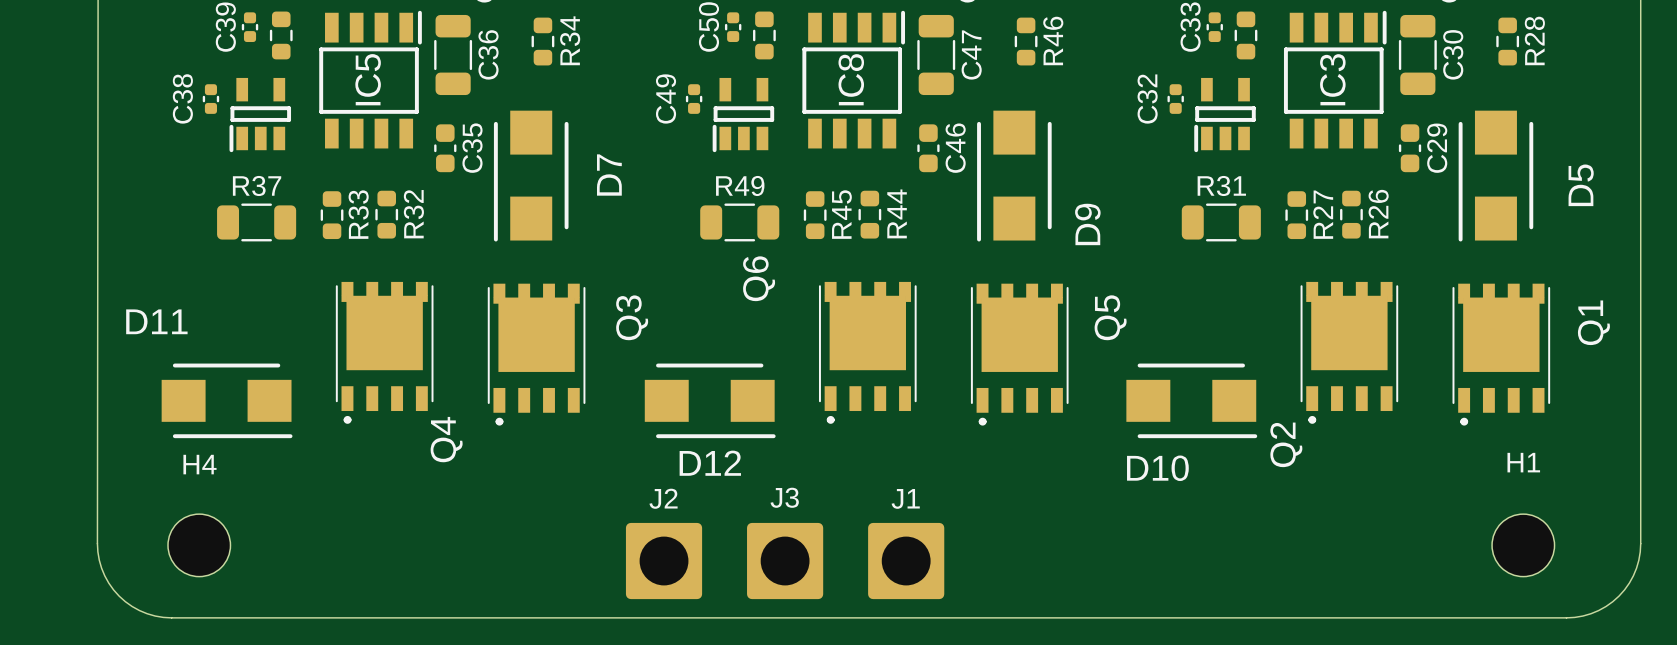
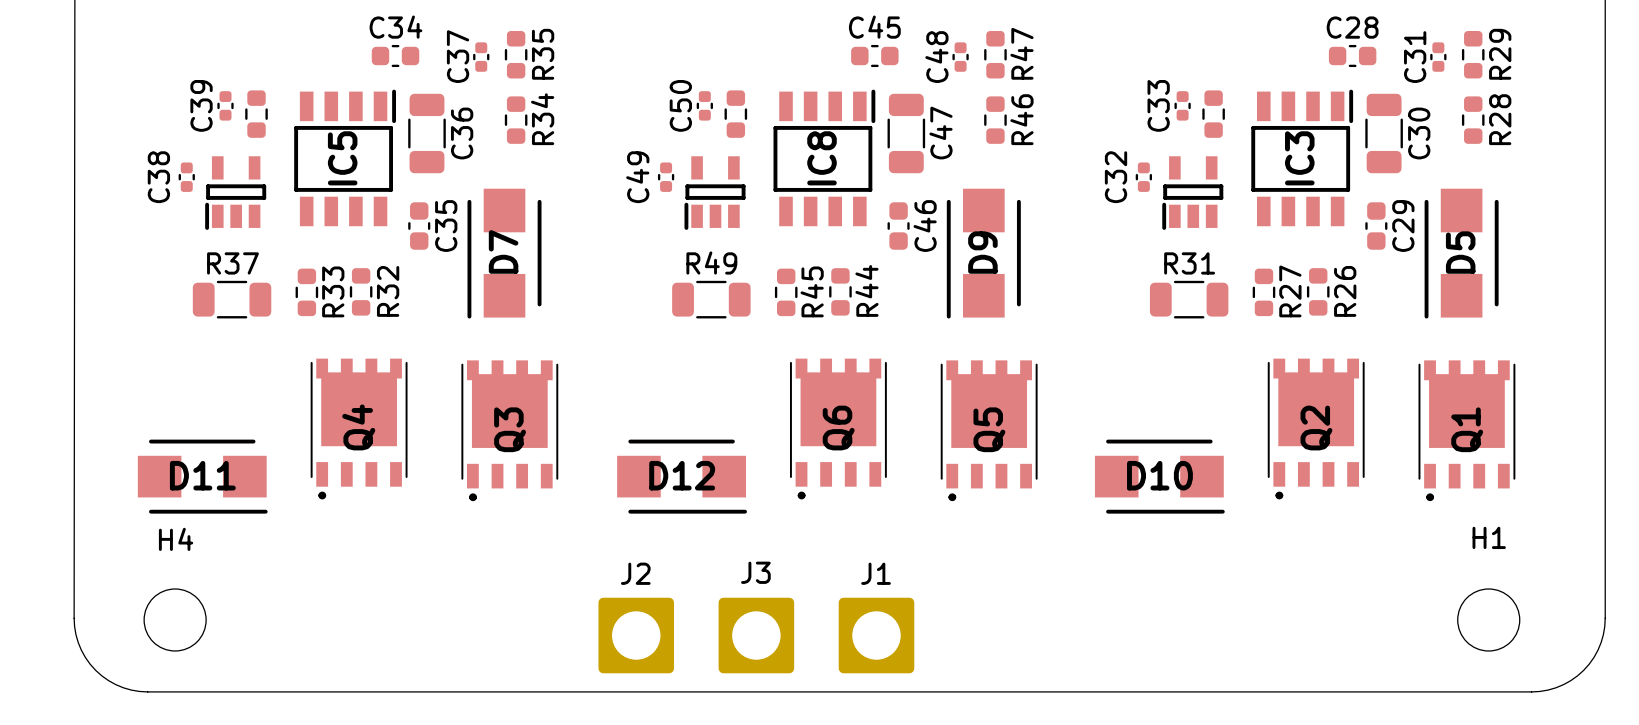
D7 name position: D7 (609, 175) -> D7 (503, 251)
D5 name position: D5 (1581, 185) -> D5 (1460, 252)
D9 name position: D9 (1087, 224) -> D9 (982, 252)
Q6 name position: Q6 (759, 278) -> Q6 (838, 428)
Q3 name position: Q3 (632, 317) -> Q3 (510, 429)
Q5 name position: Q5 (1110, 317) -> Q5 (989, 429)
D11 name position: D11 (156, 321) -> D11 (202, 475)
Q1 name position: Q1 (1593, 322) -> Q1 (1467, 429)
Q4 name position: Q4 (446, 439) -> Q4 (358, 427)
Q2 name position: Q2 (1286, 444) -> Q2 (1316, 428)
D12 name position: D12 (710, 463) -> D12 (682, 475)
D10 name position: D10 (1157, 468) -> D10 (1159, 475)

